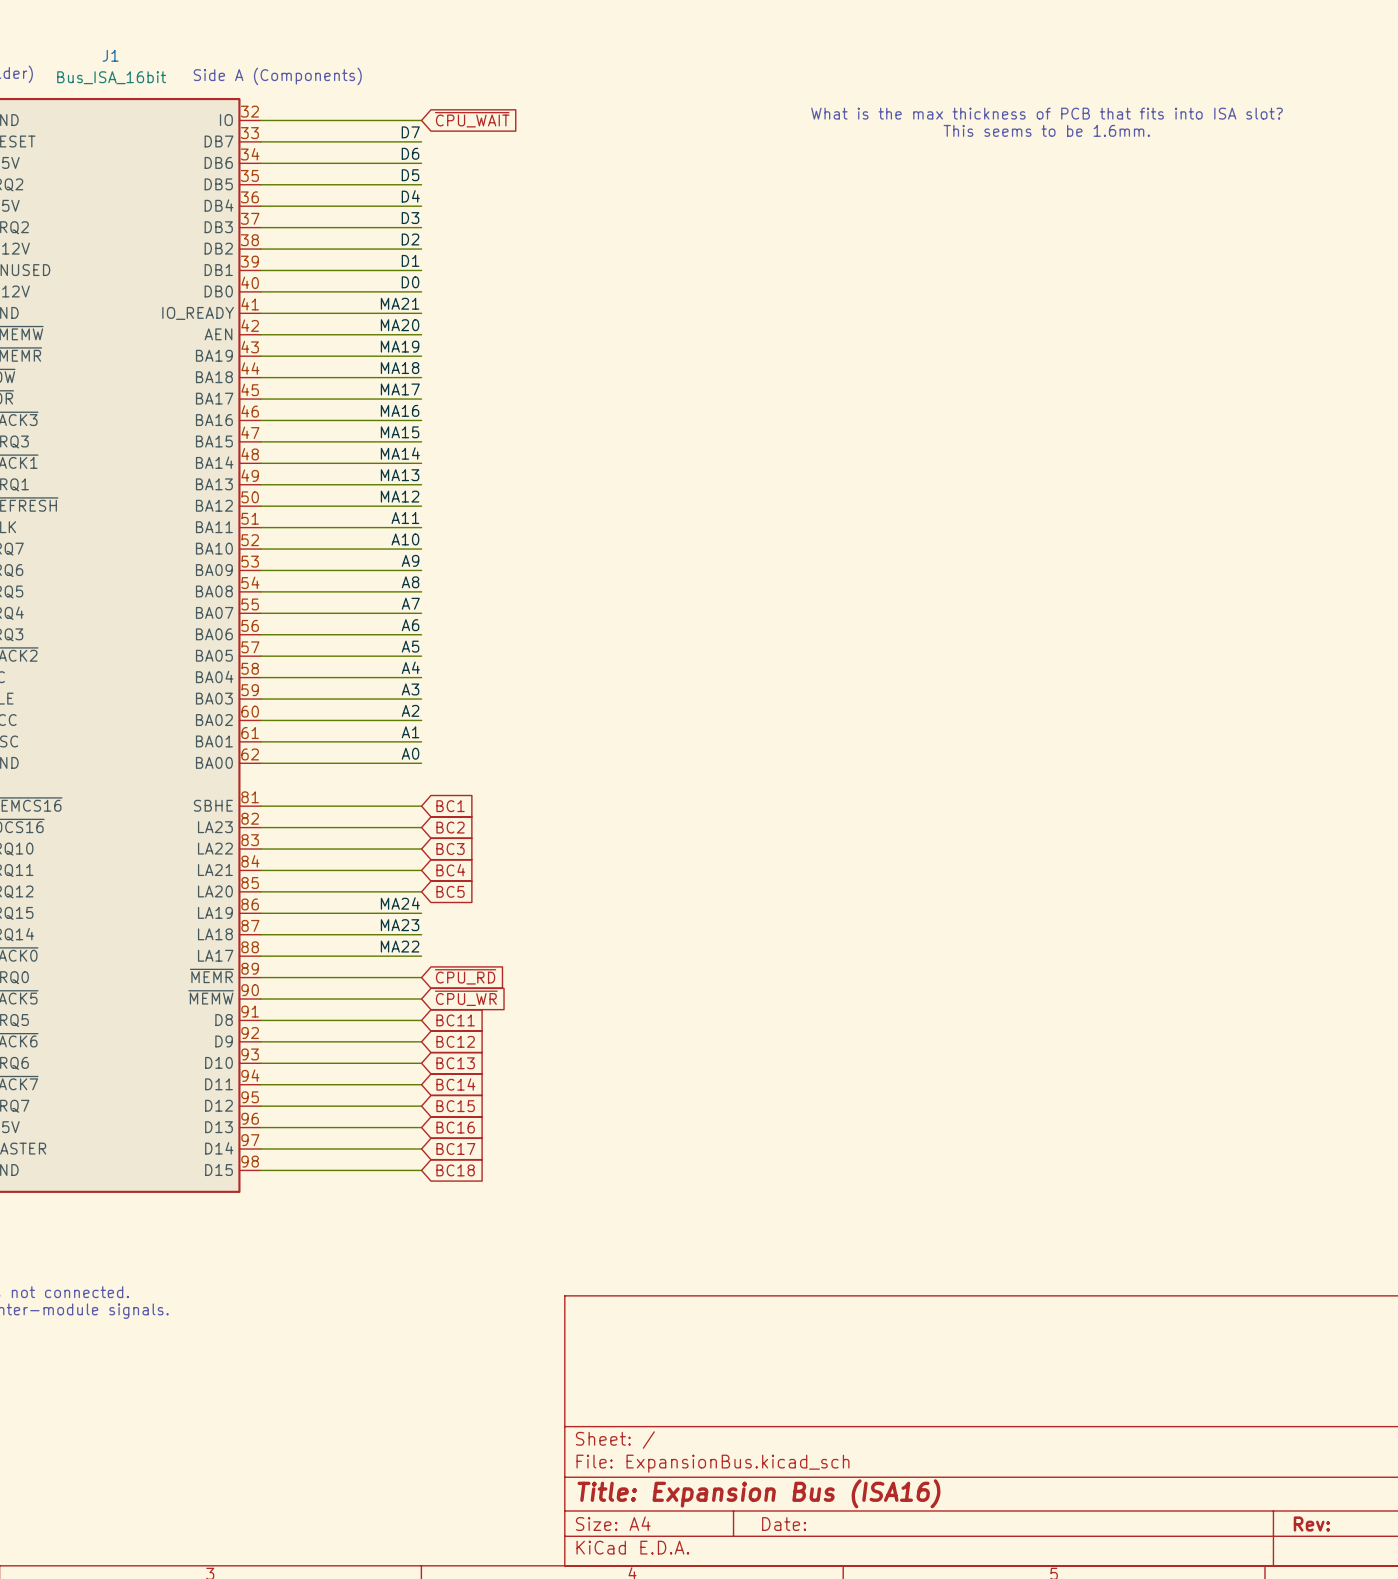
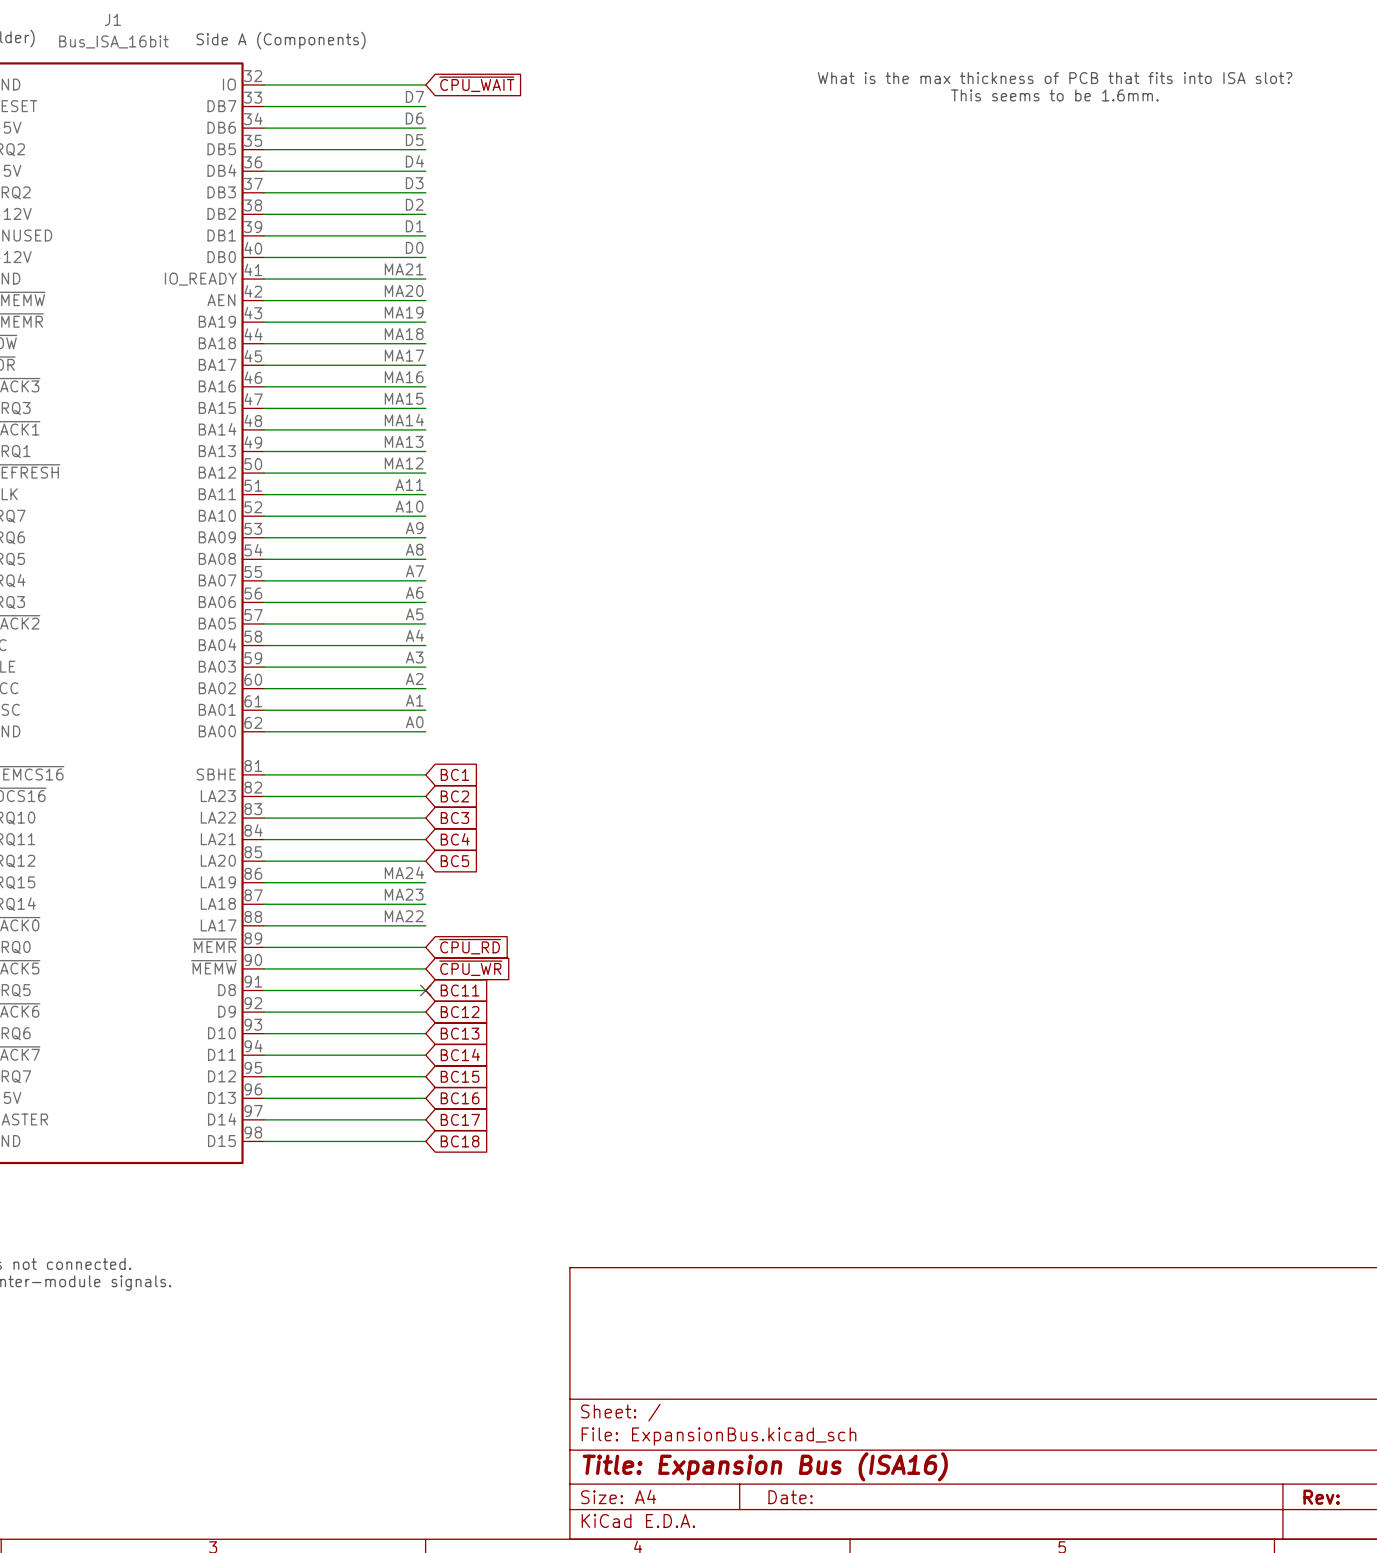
no-connect mark: none -> (425, 990)

